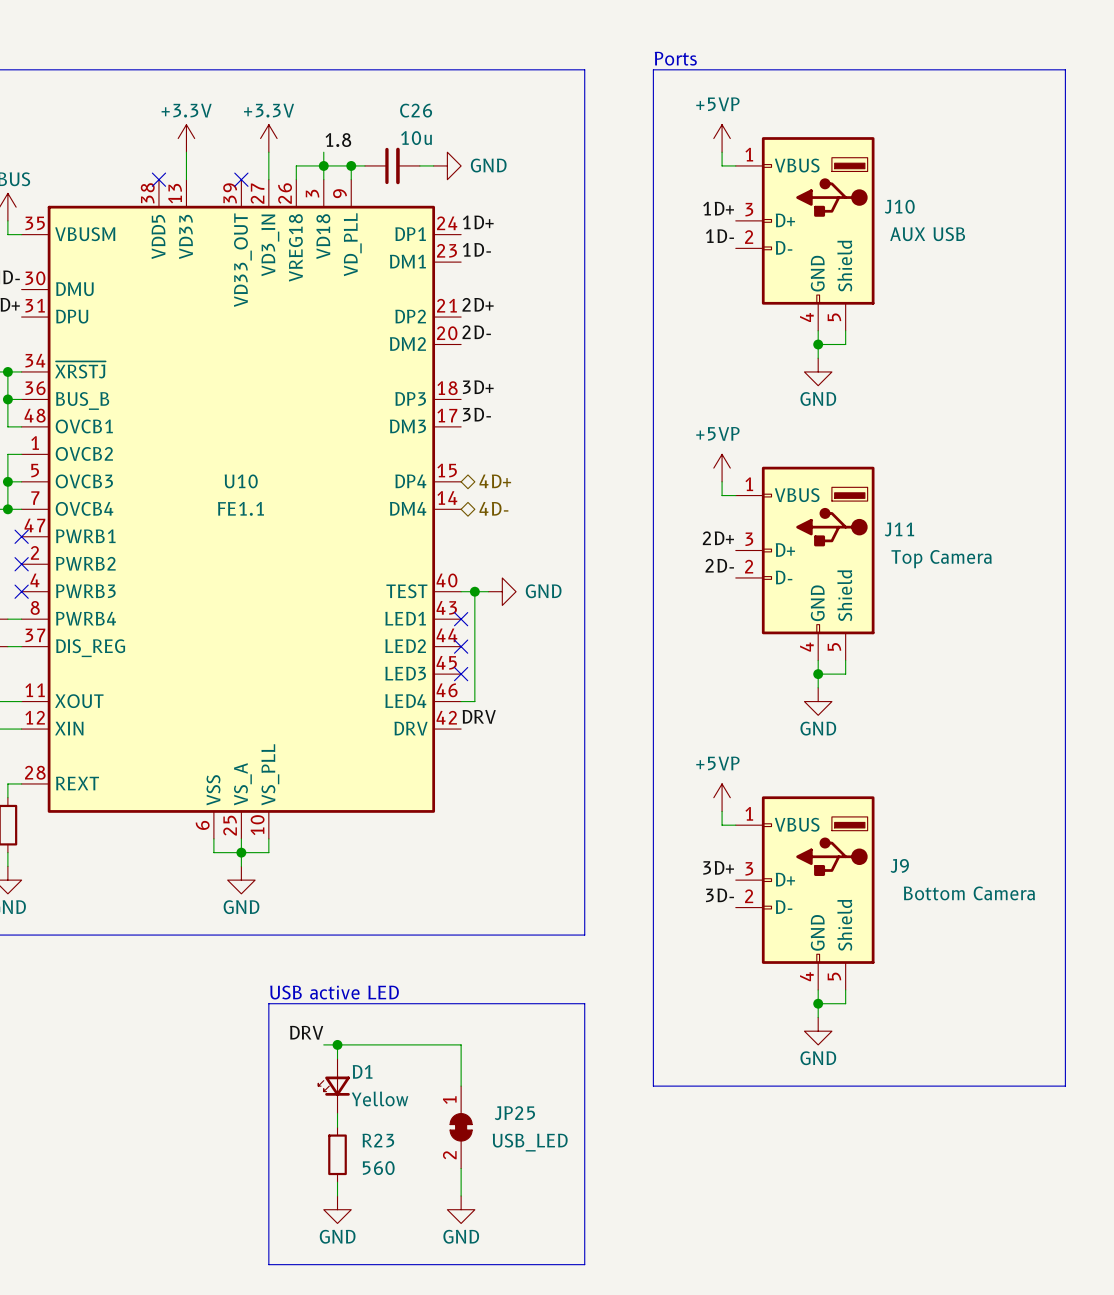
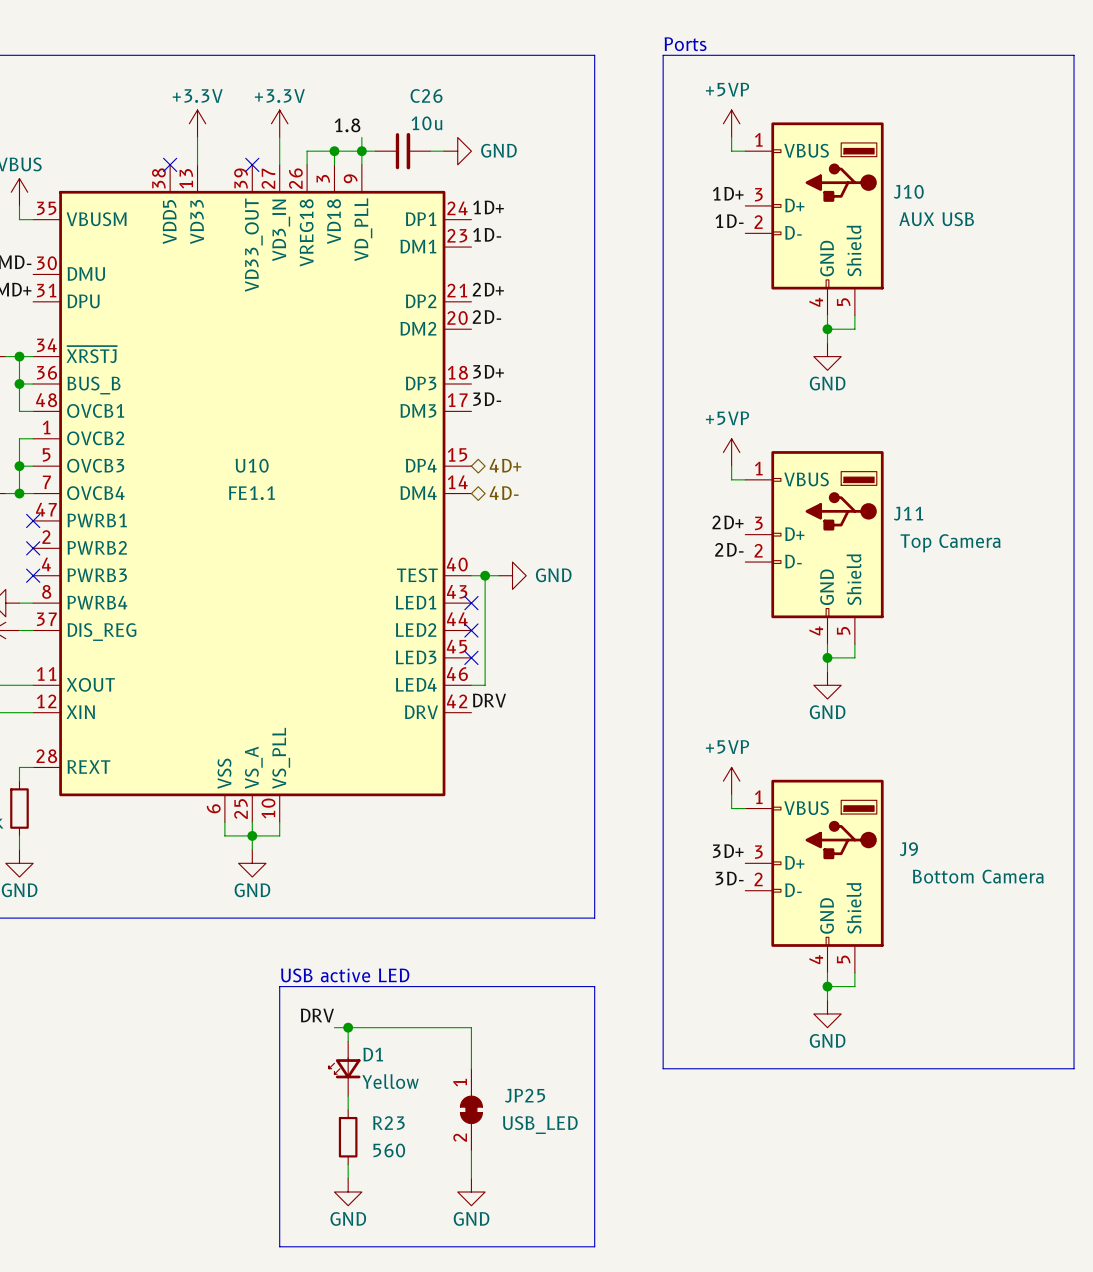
label position: 1.8 (338, 140) -> 1.8 (347, 125)
wire: (323, 152) (323, 165) -> (361, 137) (361, 151)

